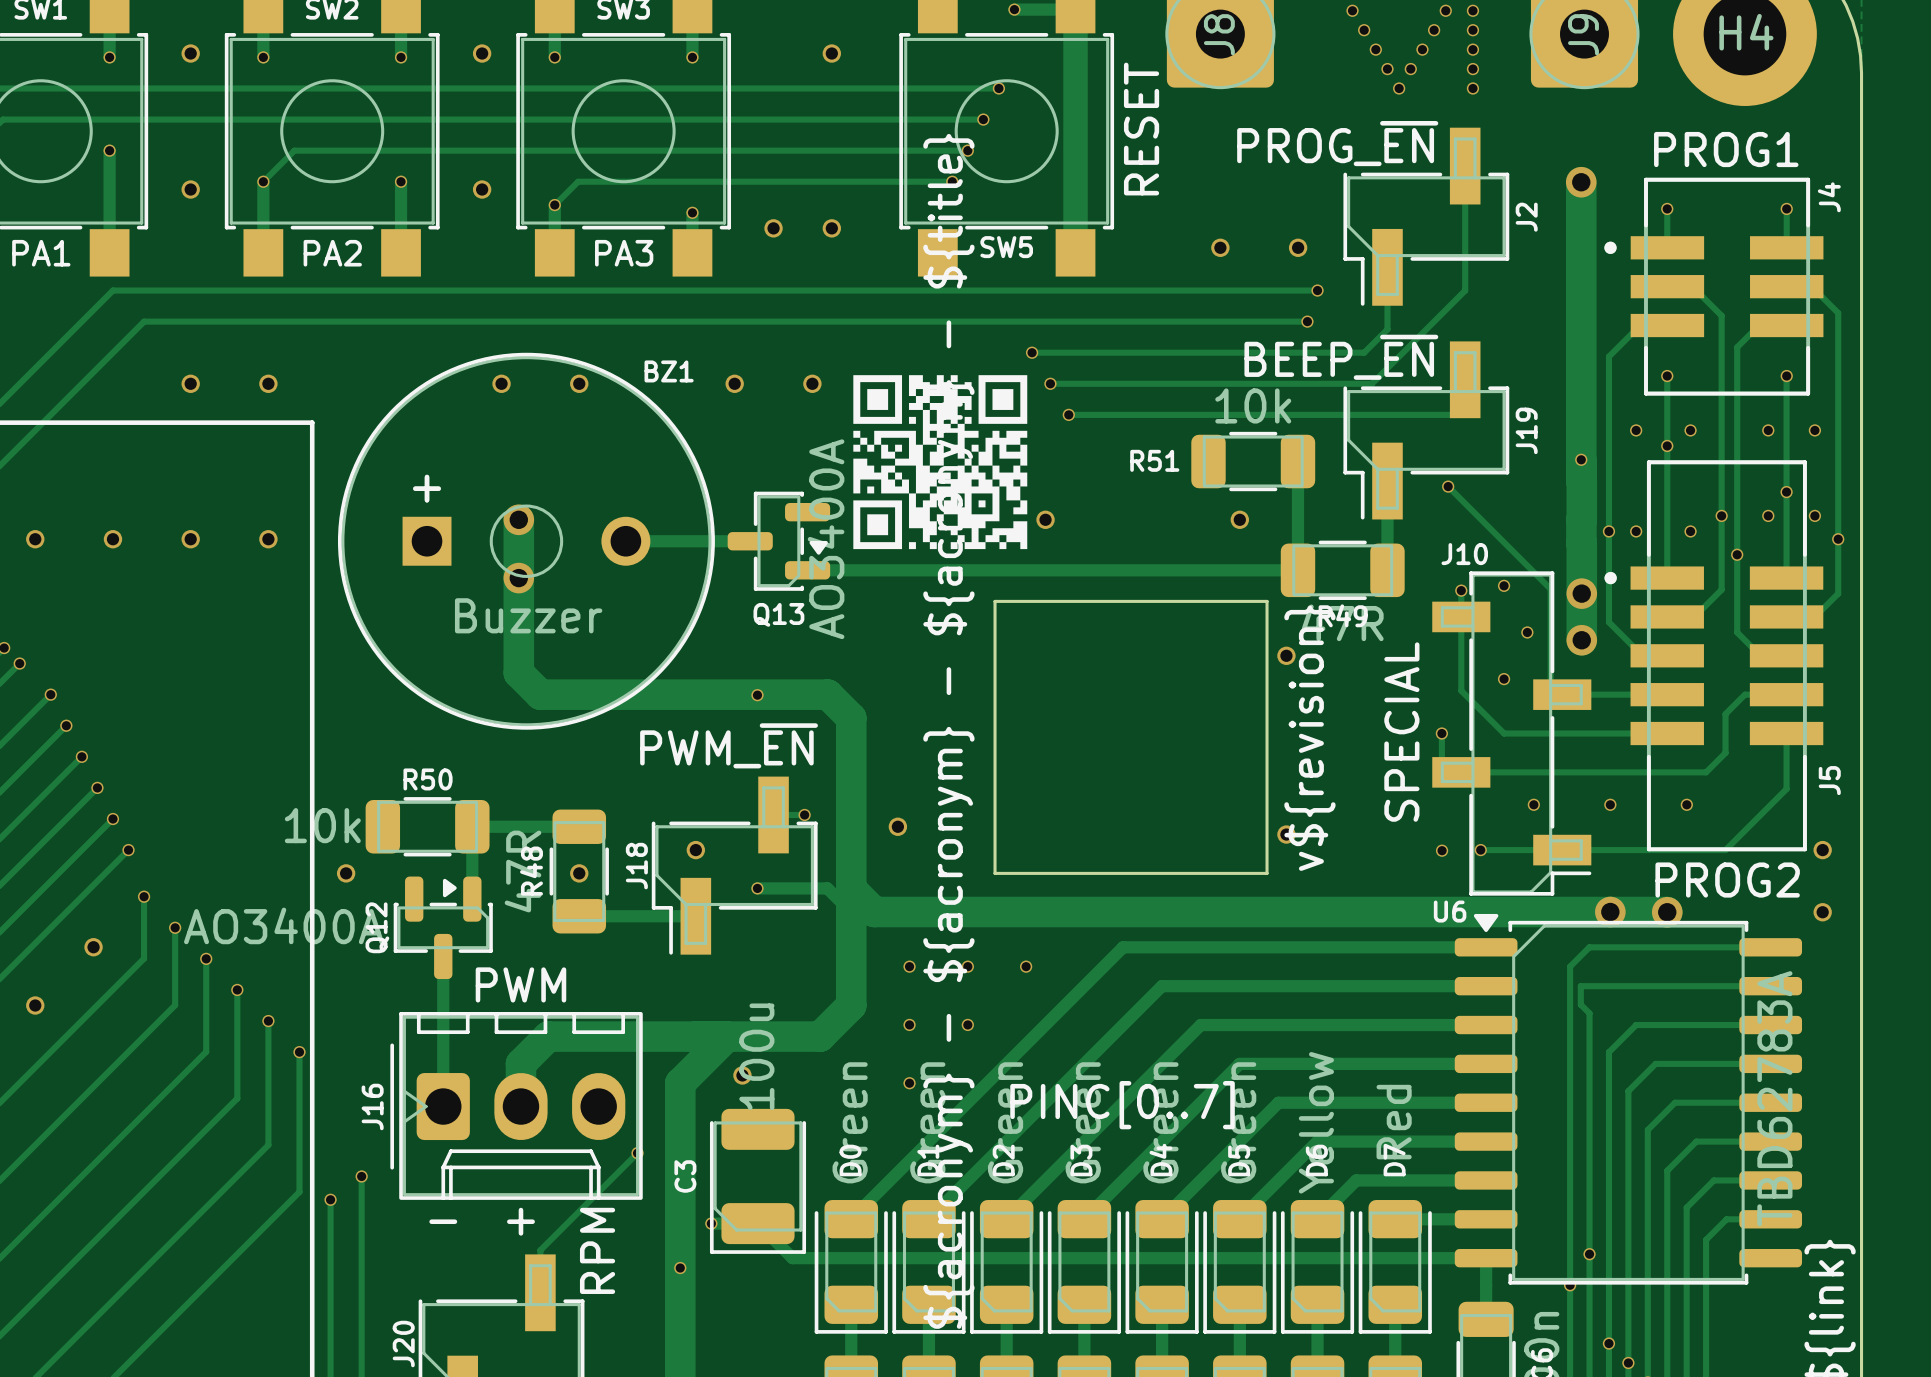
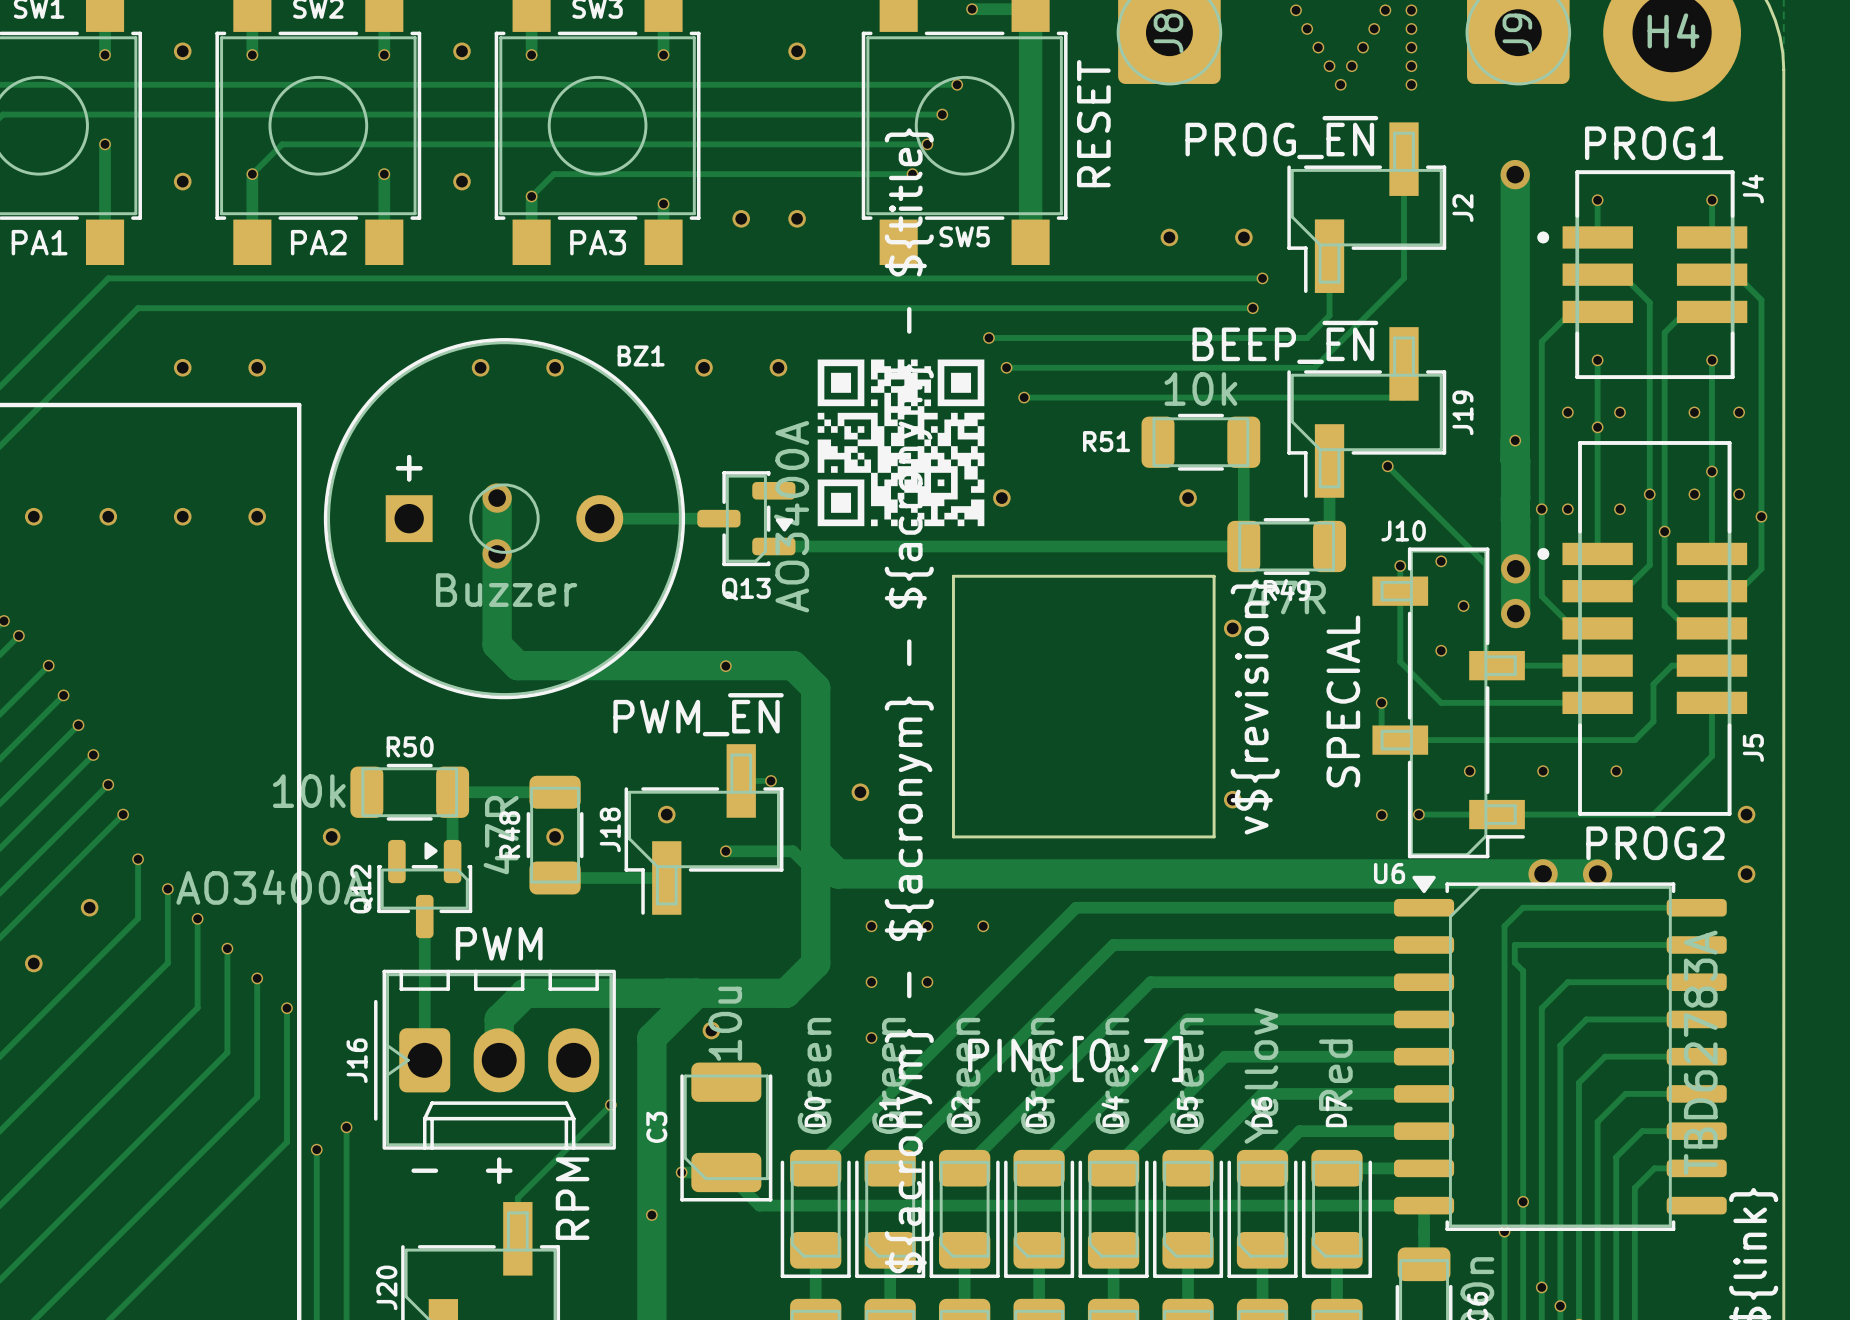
C3 value: 100u (756, 1056) -> 10u (725, 1023)

